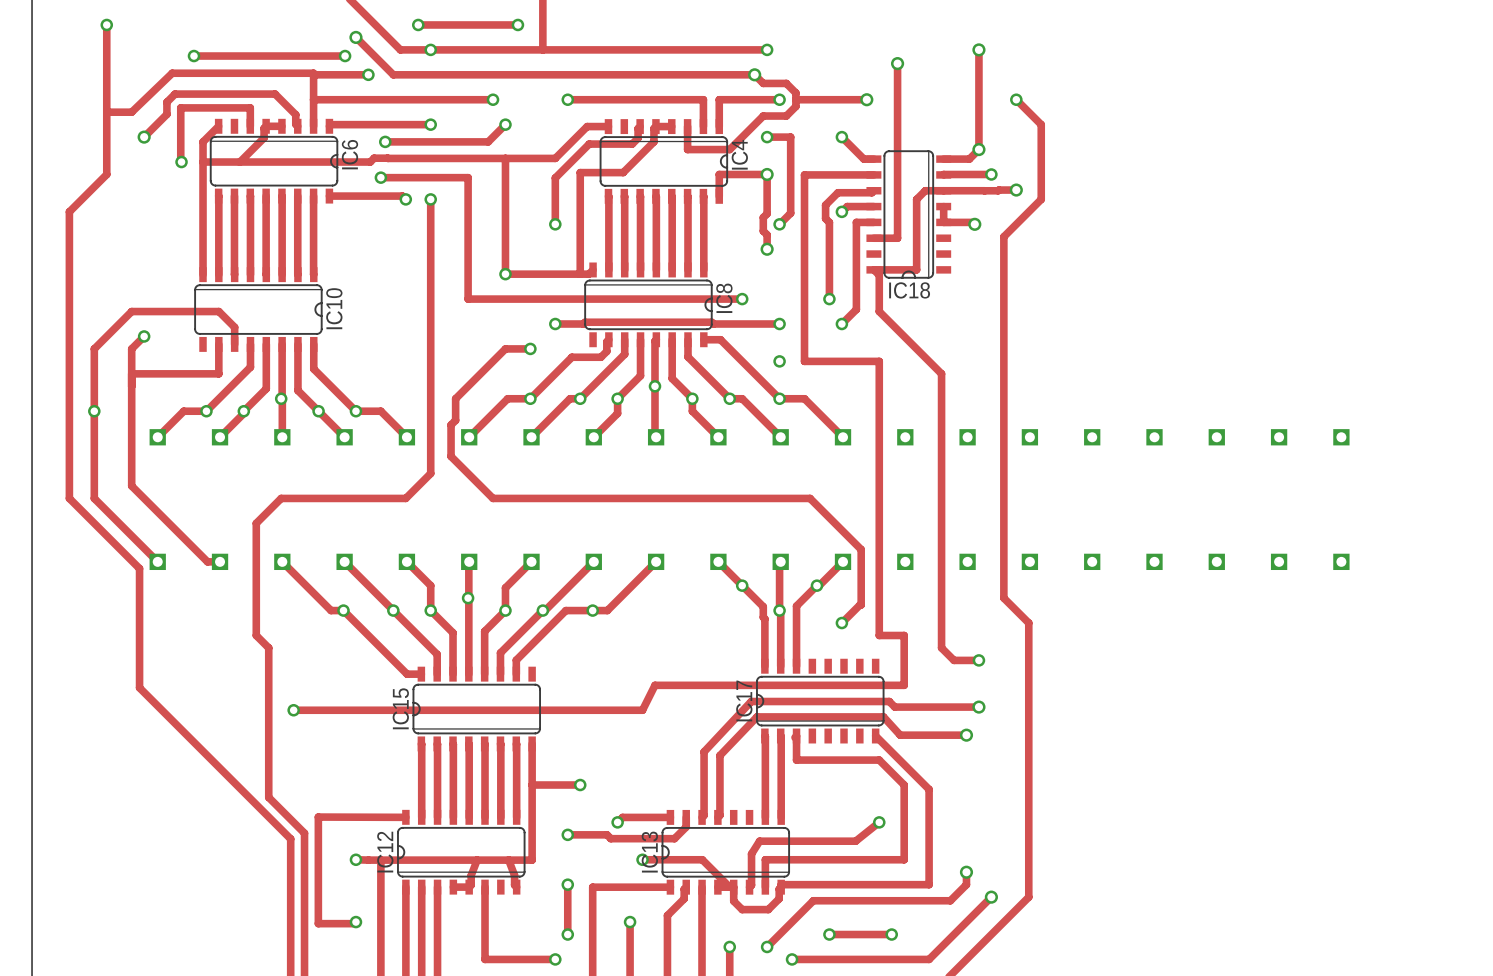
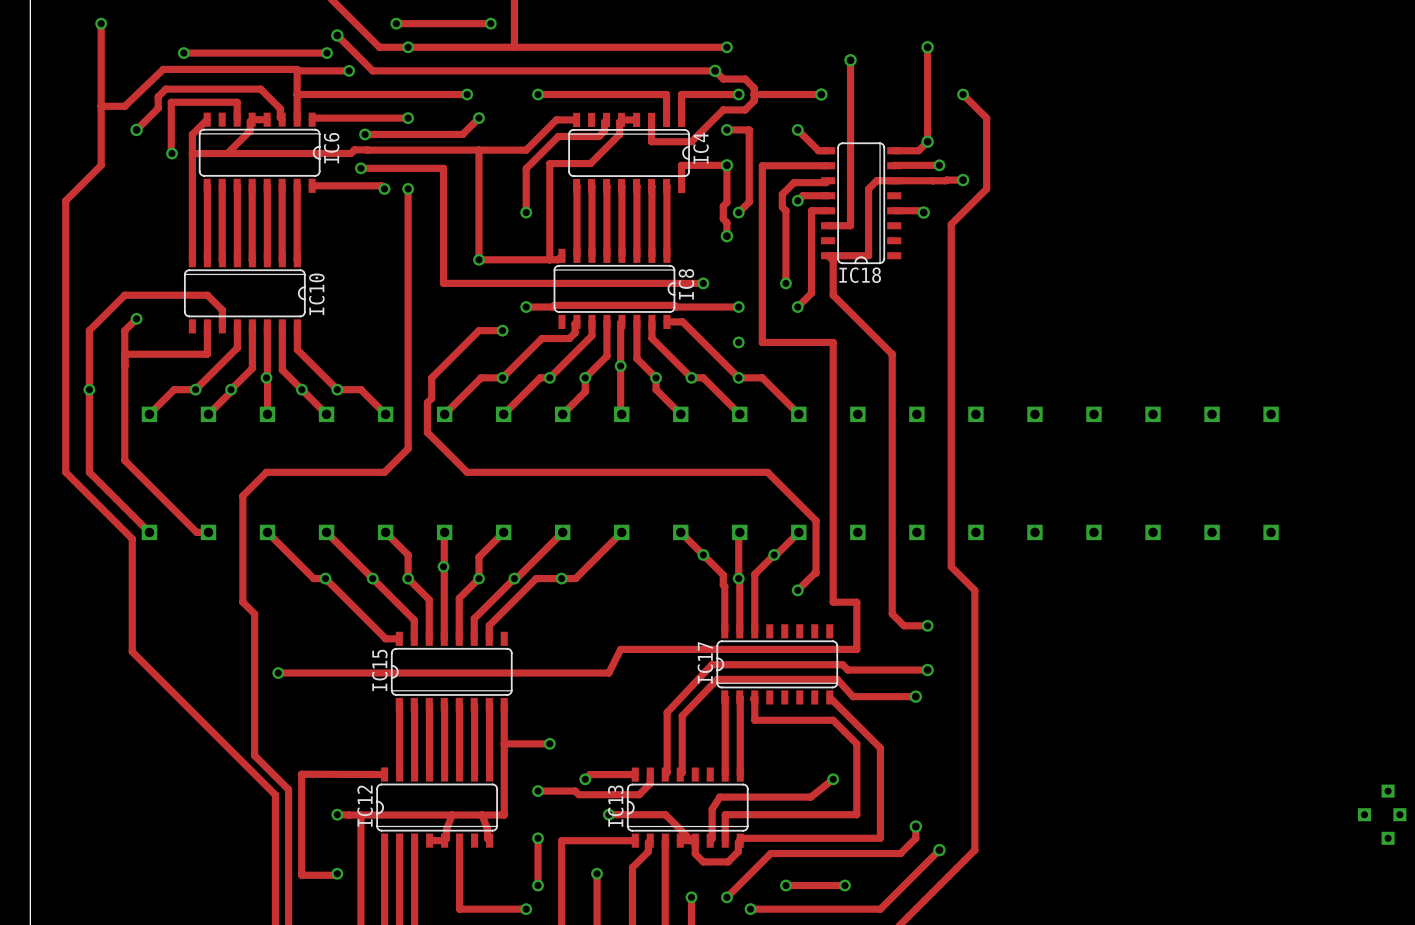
track: (943, 206) (943, 222) -> none
part: none -> (1382, 814)

